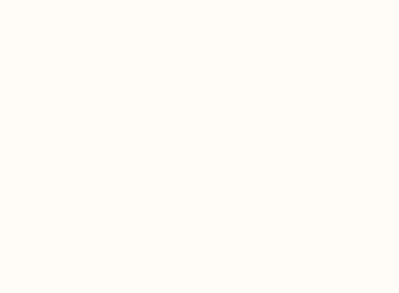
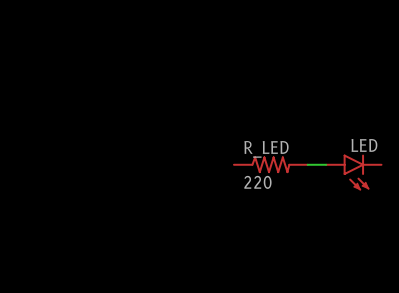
R_LED: none -> 220 (270, 164)
wire: none -> (307, 164) (326, 164)
LED: none -> (353, 172)

